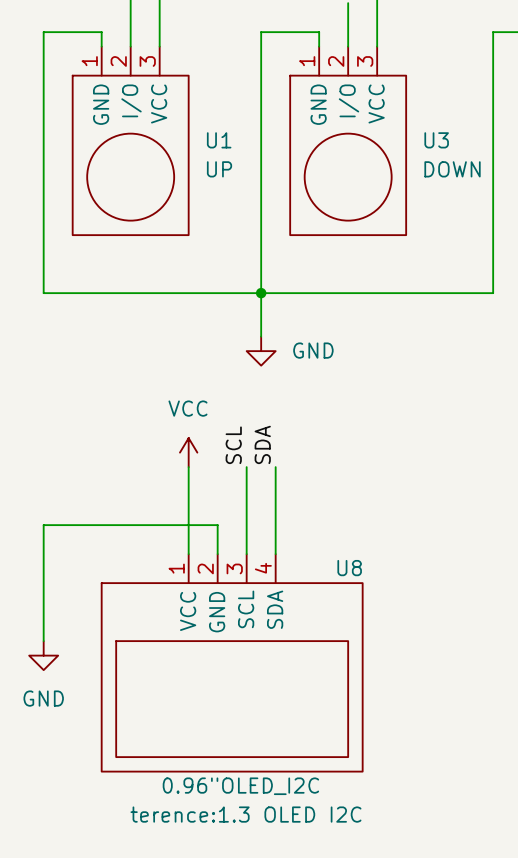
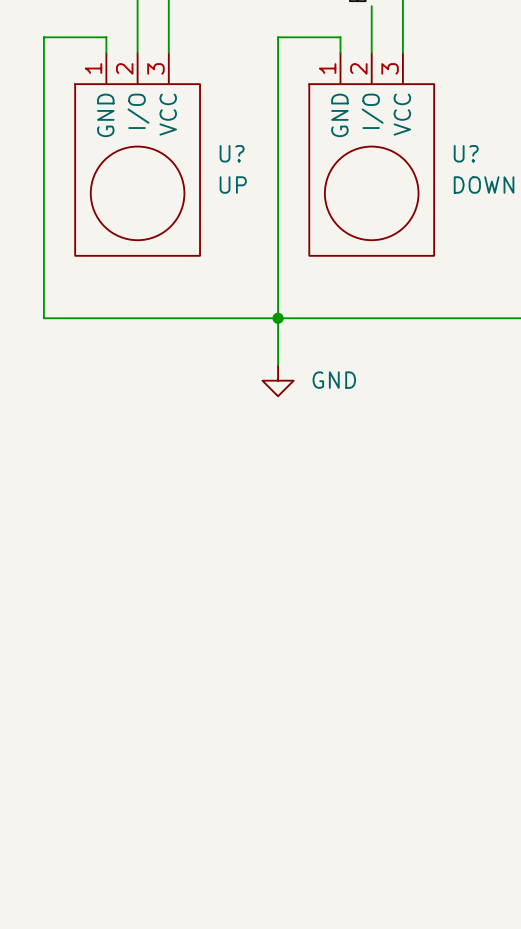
U1 name: U1 (219, 140) -> U? (232, 153)
U3 name: U3 (436, 140) -> U? (466, 153)
label: SDA (262, 444) -> none
label: SCL (233, 445) -> none
power symbol: VCC (188, 452) -> none
wire: (188, 467) (188, 554) -> none
wire: (246, 467) (246, 554) -> none
wire: (275, 467) (275, 554) -> none
wire: (217, 554) (217, 525) (43, 525) (43, 641) -> none
power symbol: GND (43, 655) -> none
U8: 0.96"OLED_I2C (232, 662) -> none

